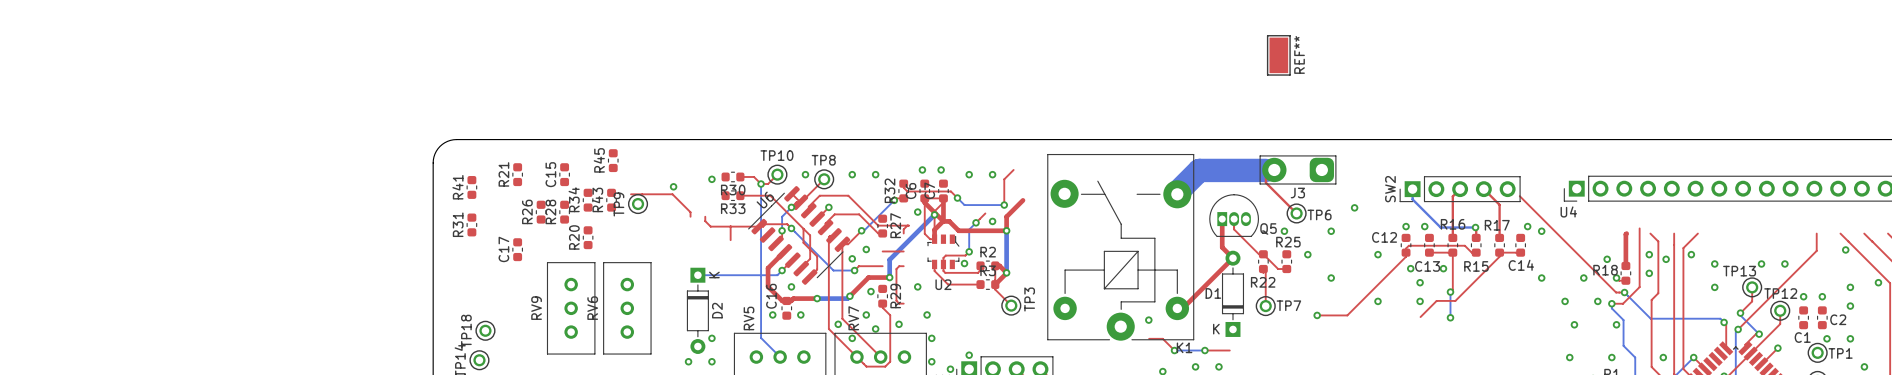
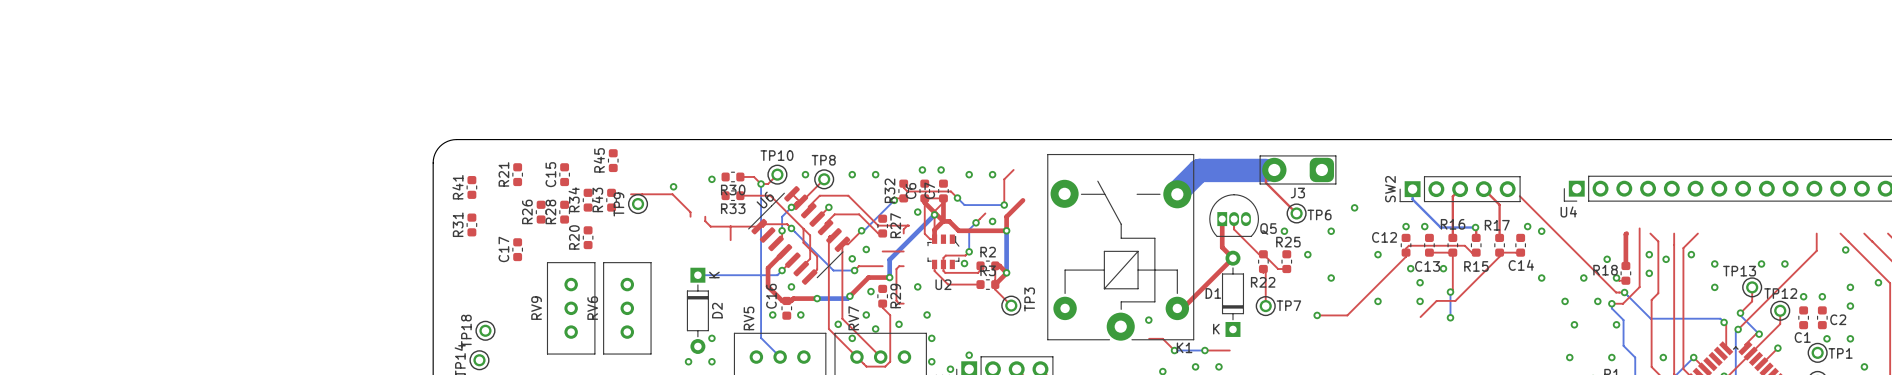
REF**: (1278, 55) -> none

